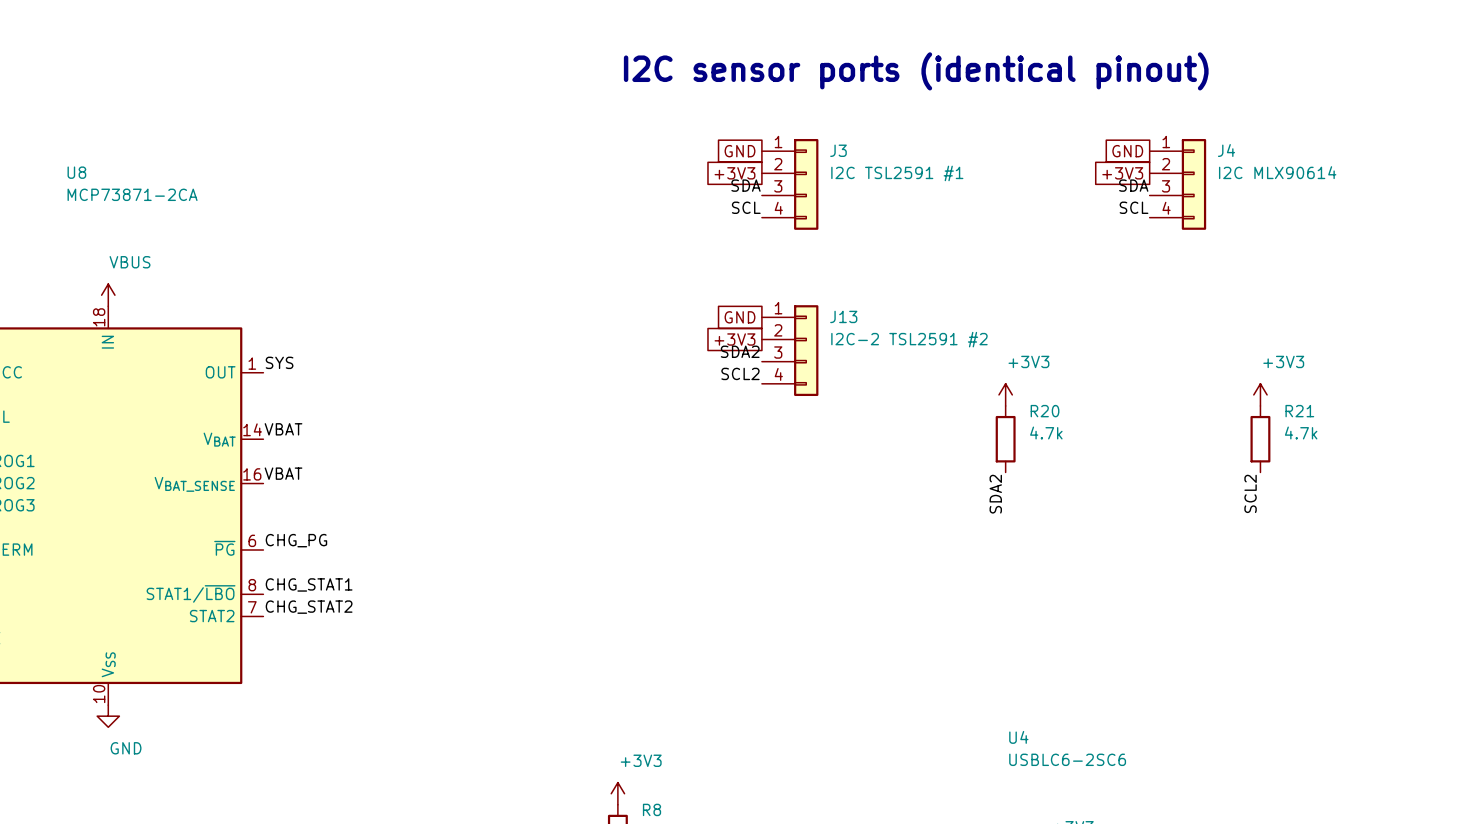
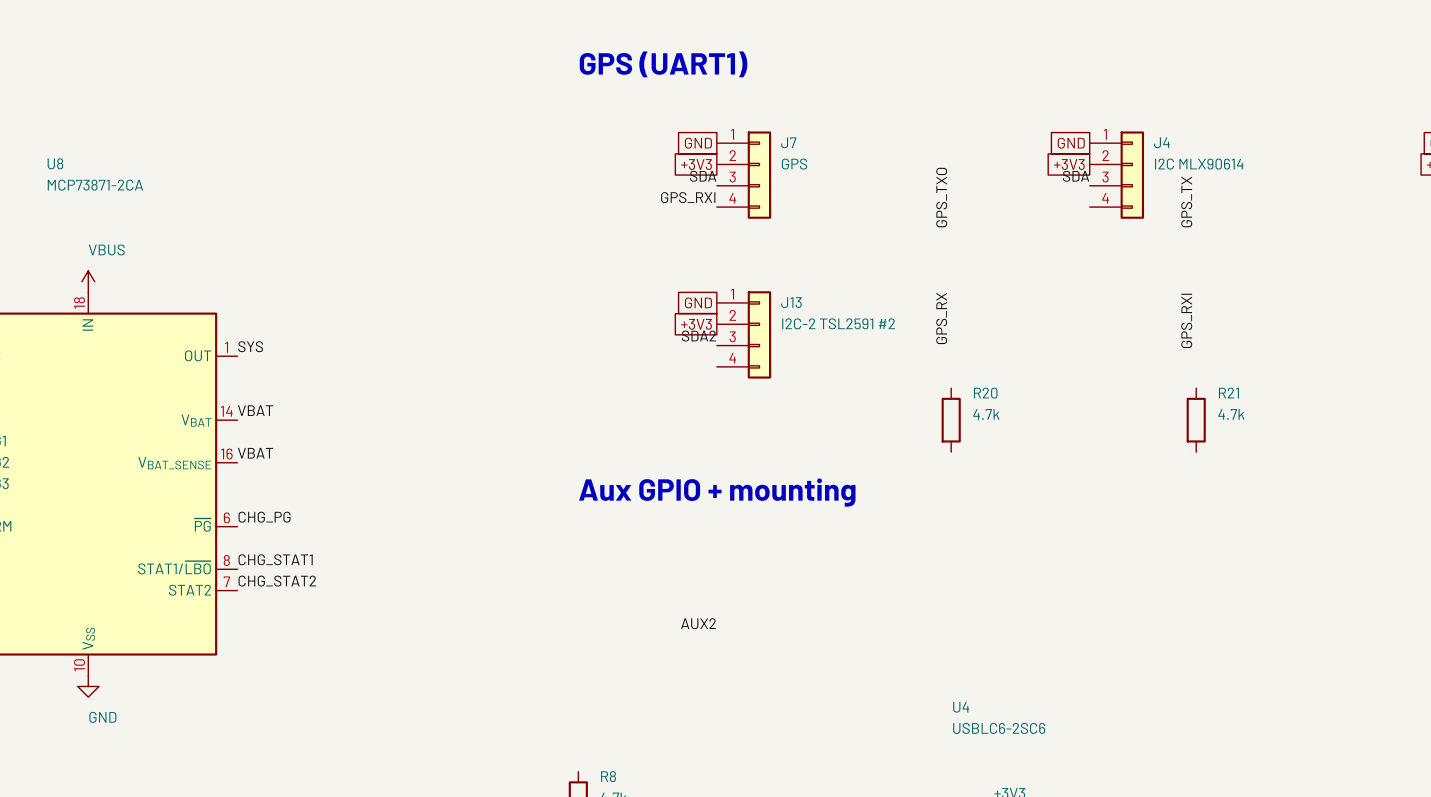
text: I2C sensor ports (identical pinout) (916, 71) -> GPS (UART1) (663, 64)
J3 name: J3 (838, 150) -> J7 (788, 142)
J3 value: I2C TSL2591 #1 (897, 173) -> GPS (794, 164)
label: none -> GPS_TXO (941, 197)
label: SCL (746, 207) -> GPS_RXI (688, 197)
label: SCL (1134, 207) -> none
label: none -> GPS_TX (1186, 202)
label: none -> GPS_RX (941, 318)
label: none -> GPS_RXI (1186, 320)
label: SCL2 (740, 373) -> none
power symbol: +3V3 (1005, 394) -> none
power symbol: +3V3 (1260, 394) -> none
label: SCL2 (1250, 493) -> none
label: SDA2 (995, 494) -> none
text: none -> Aux GPIO + mounting (717, 492)
label: none -> AUX2 (698, 623)
power symbol: +3V3 (617, 793) -> none

